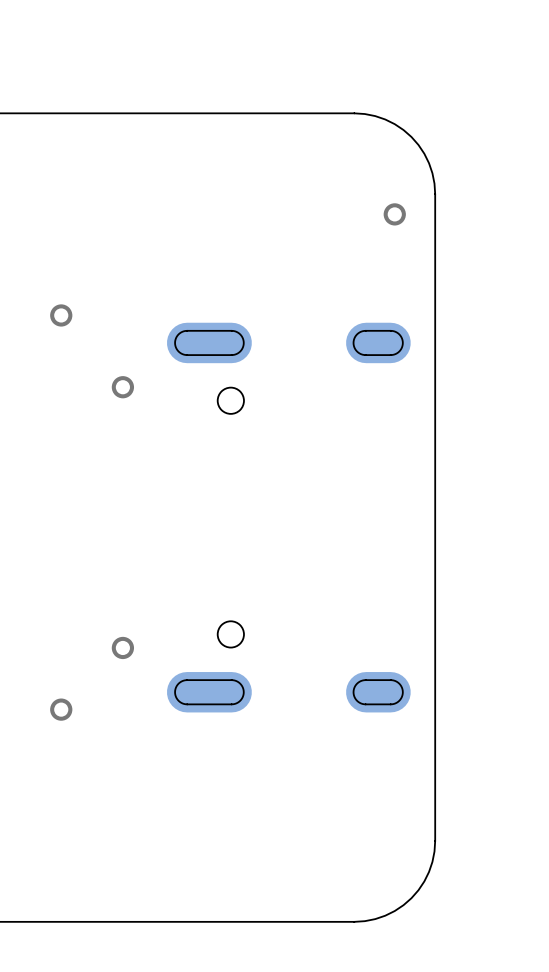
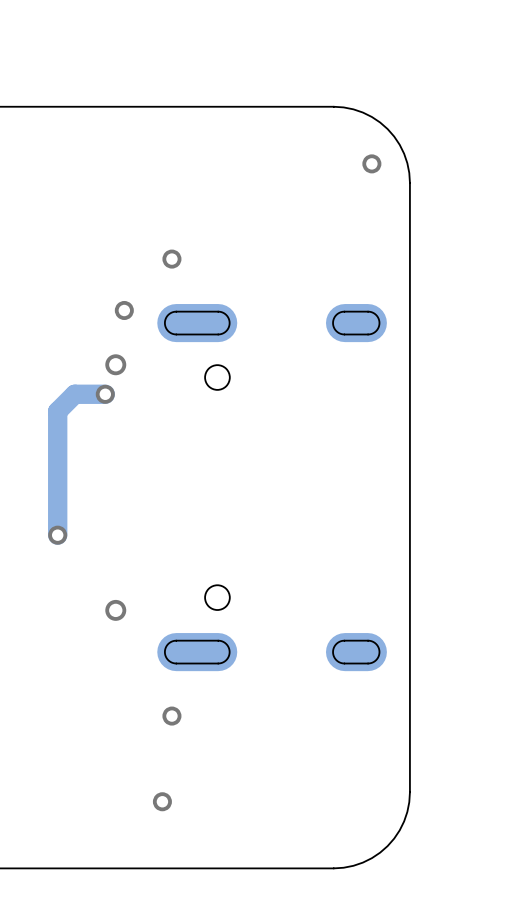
via: none -> (371, 163)
via: (394, 214) -> none
via: none -> (171, 259)
via: (61, 315) -> none
via: none -> (124, 310)
track: none -> (105, 394) (74, 394) (57, 411) (57, 535)
via: none -> (105, 394)
via: none -> (57, 535)
via: (61, 709) -> none
via: none -> (171, 716)
via: none -> (162, 801)

